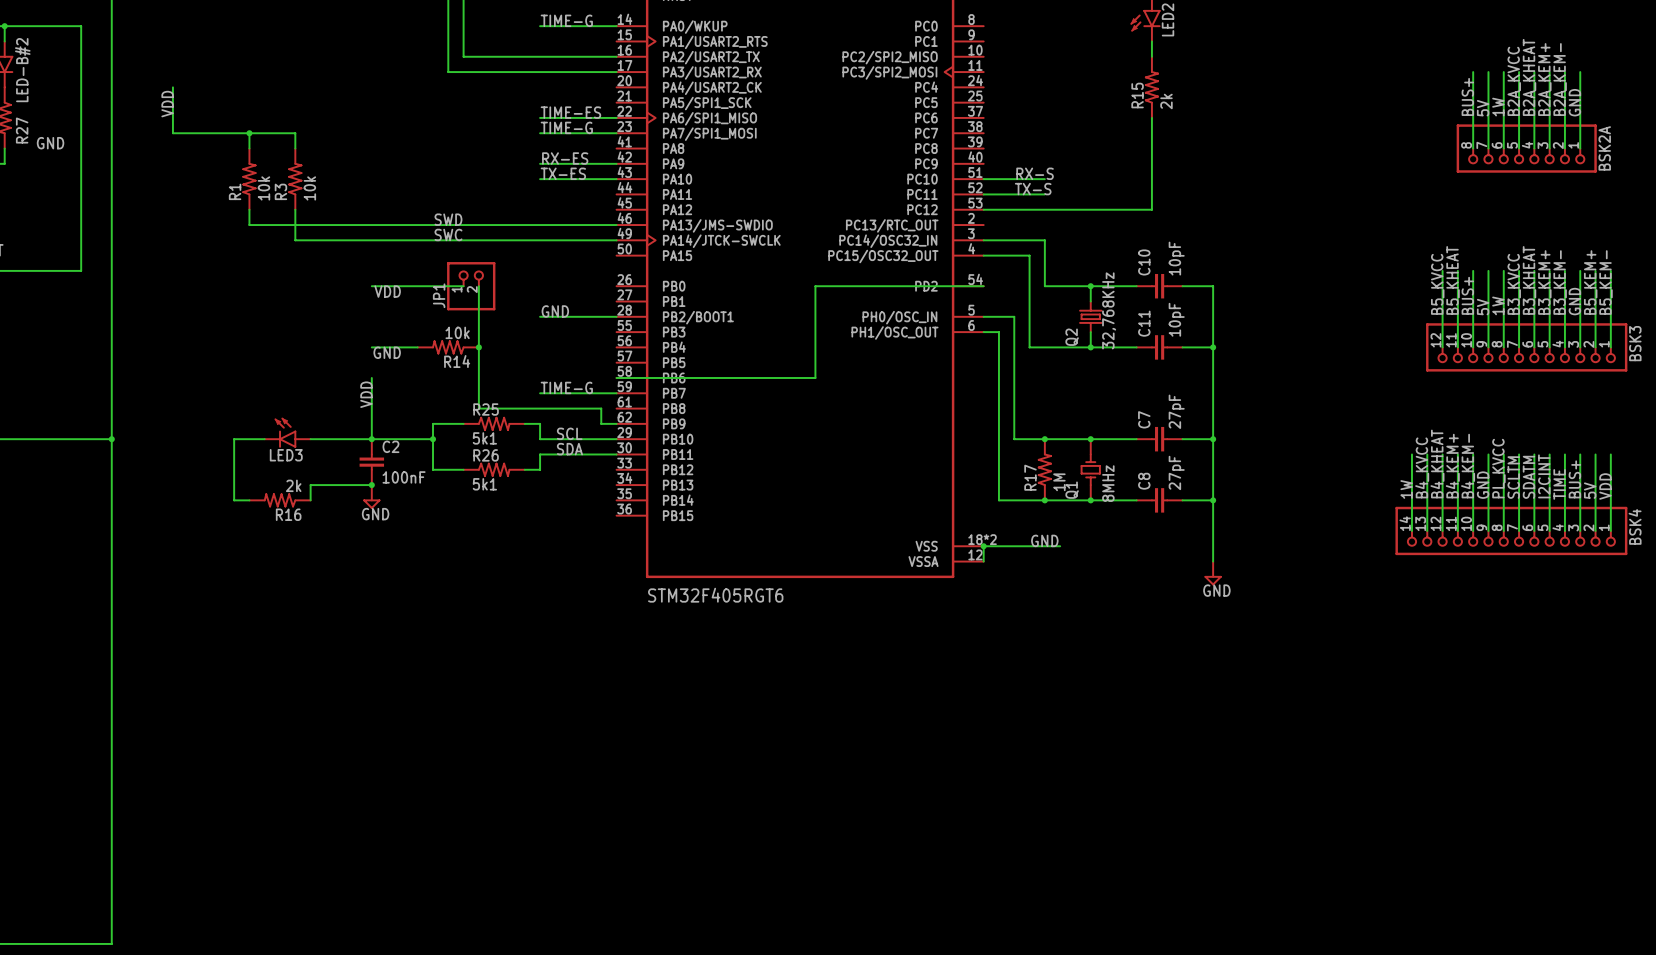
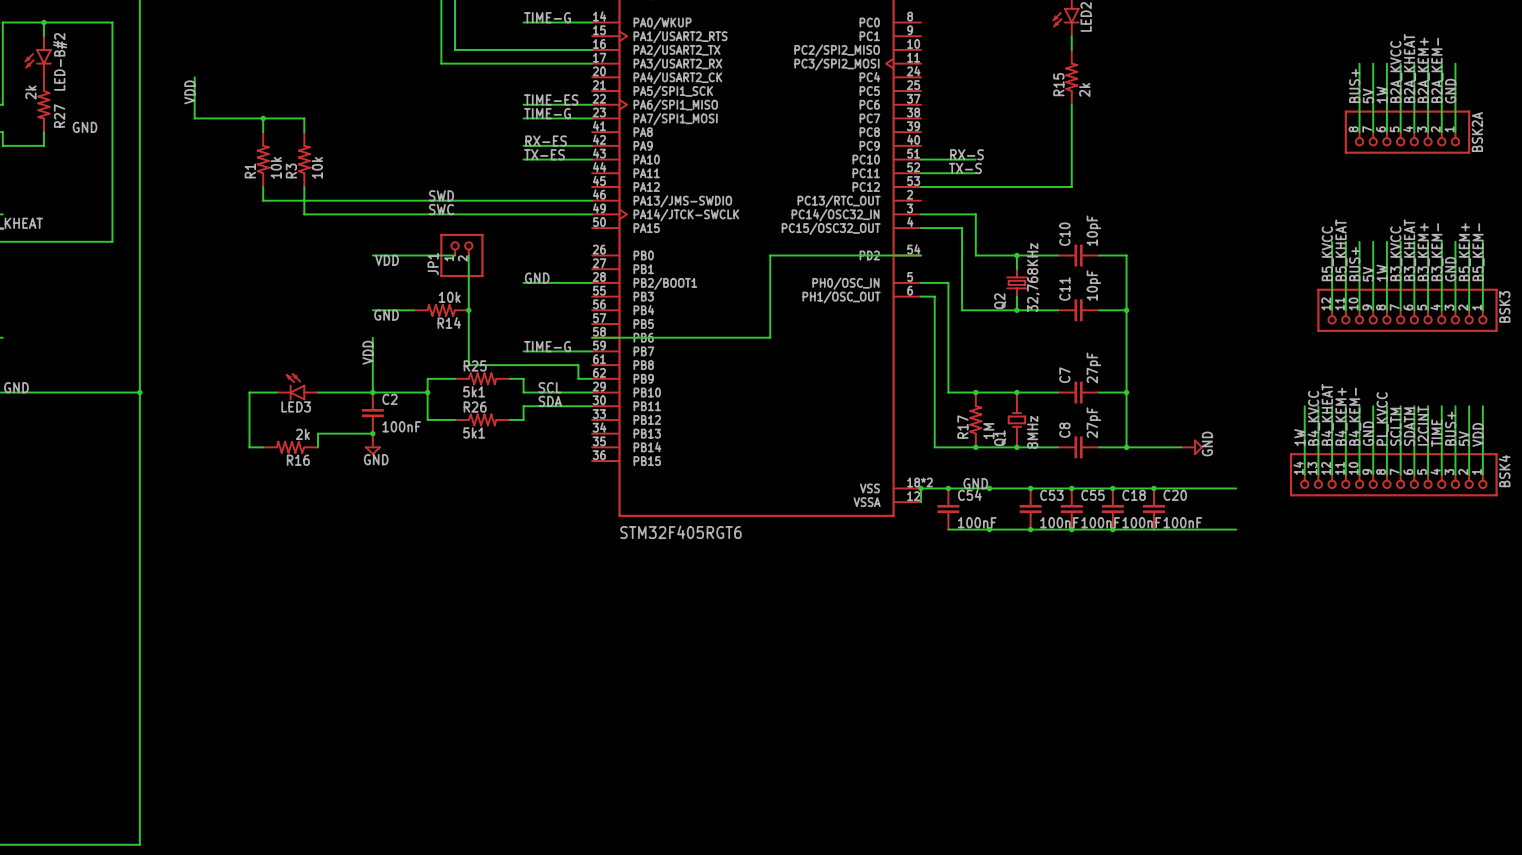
wire: (1213, 500) (1213, 561) -> (1126, 447) (1181, 447)
junction: none -> (948, 488)
wire: none -> (989, 488) (1236, 488)
junction: none -> (989, 488)
junction: none -> (1030, 488)
junction: none -> (1071, 488)
junction: none -> (1112, 488)
junction: none -> (1153, 488)
C54: none -> 100nF (948, 509)
C53: none -> 100nF (1030, 509)
C55: none -> 100nF (1071, 509)
C18: none -> 100nF (1112, 509)
C20: none -> 100nF (1153, 509)
power symbol position: GND (1213, 573) -> GND (1192, 447)
power symbol rotation: 0° (1213, 580) -> 90° counterclockwise (1198, 447)
wire: none -> (948, 529) (1236, 529)
junction: none -> (989, 529)
junction: none -> (1030, 529)
junction: none -> (1071, 529)
junction: none -> (1112, 529)

